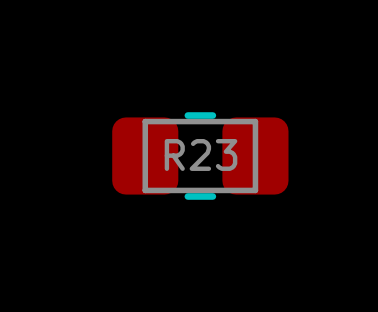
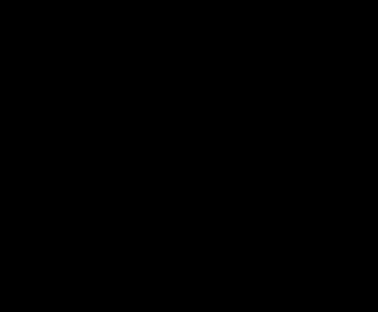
R23: (200, 156) -> none

